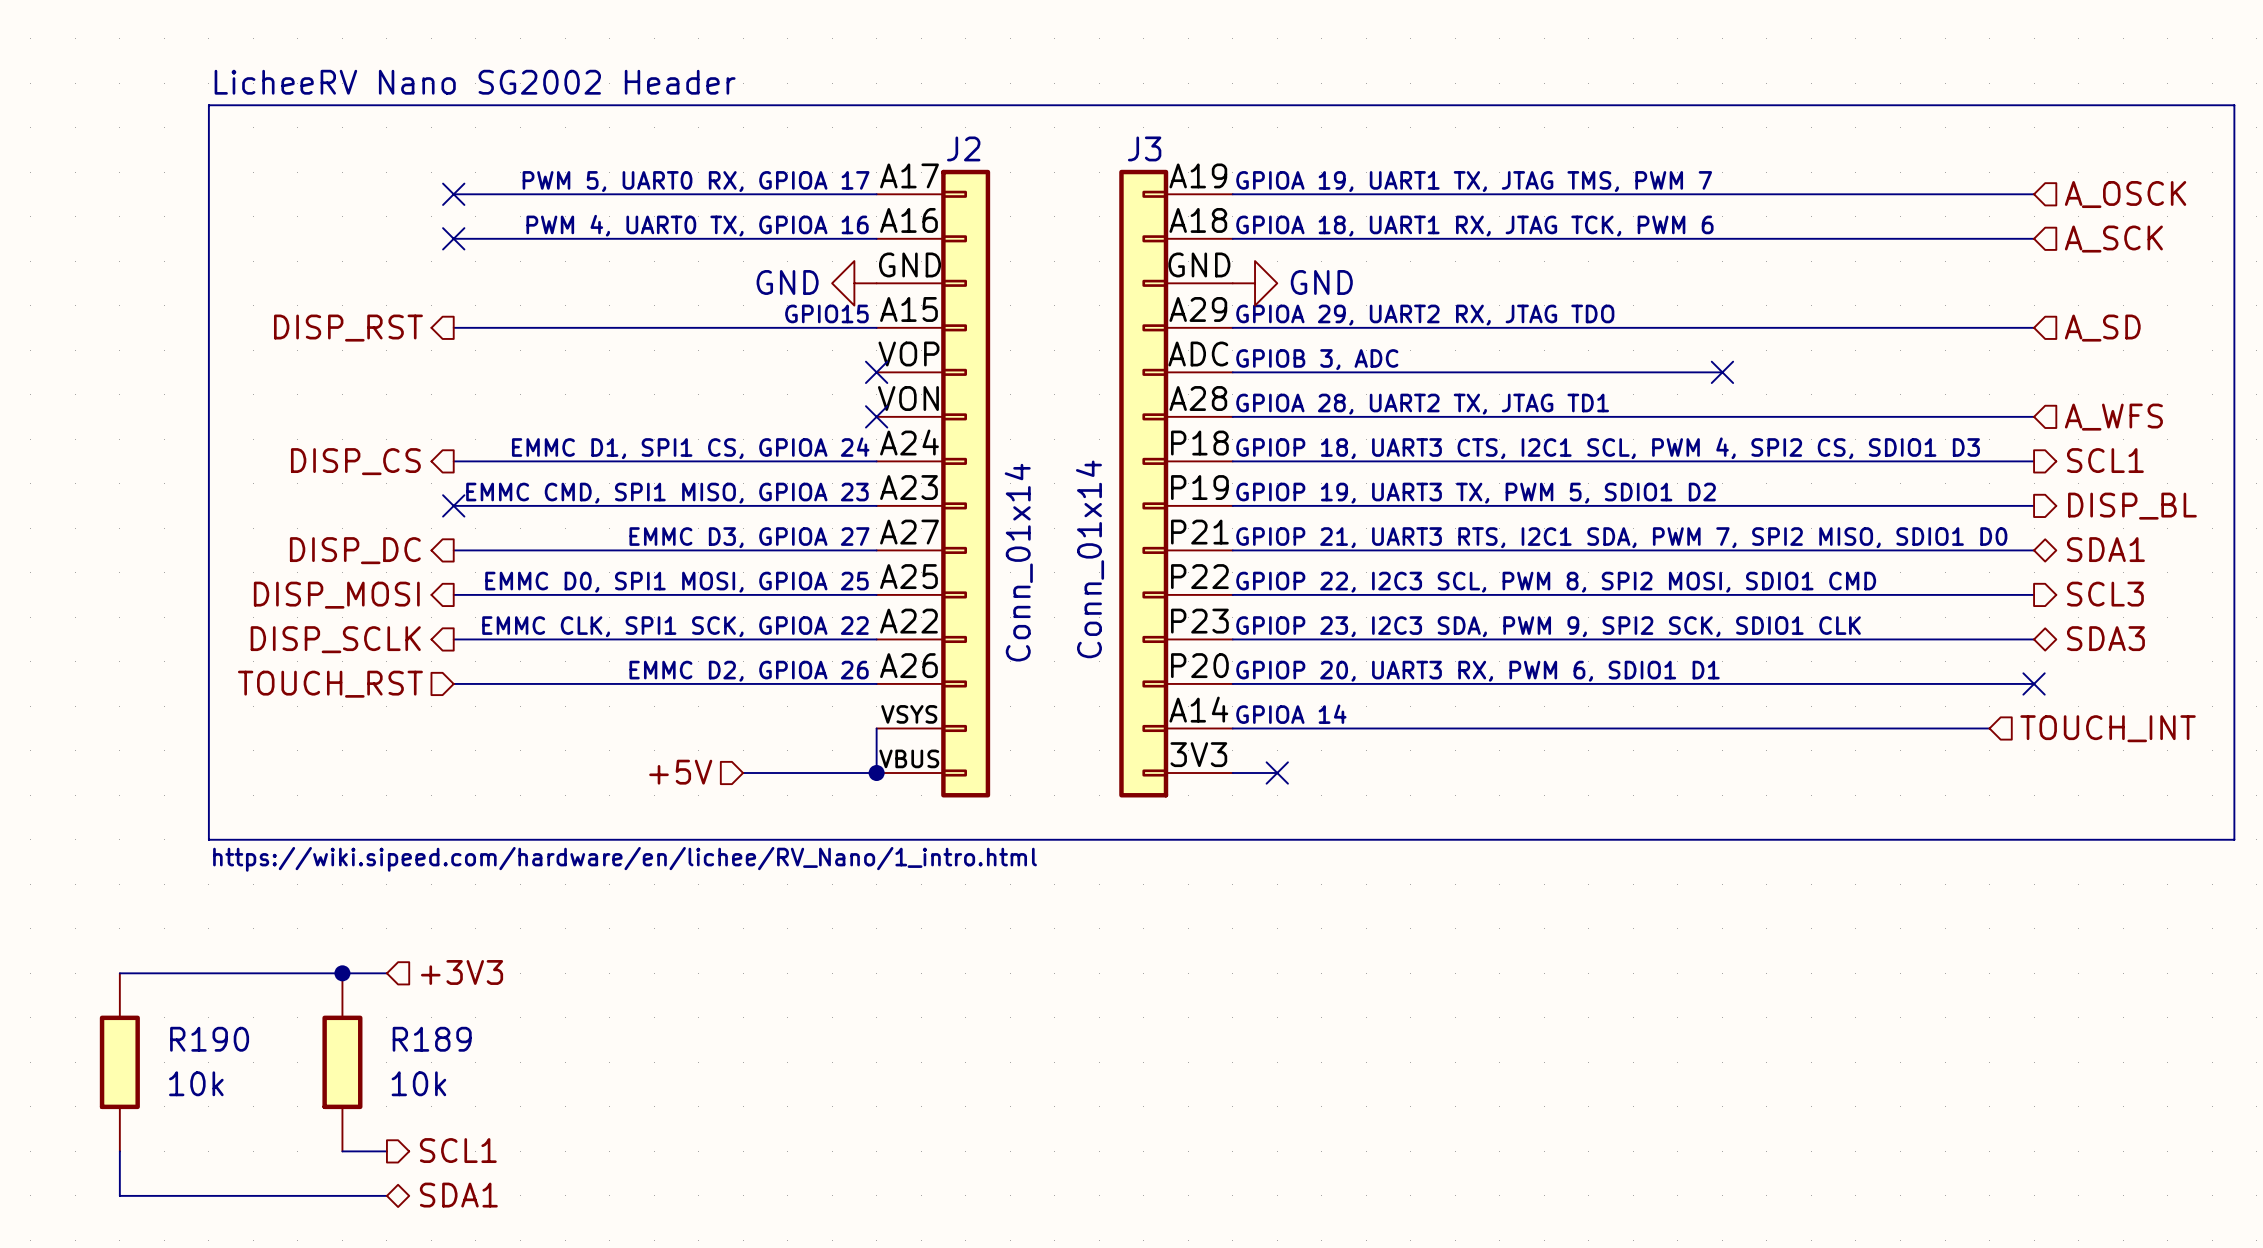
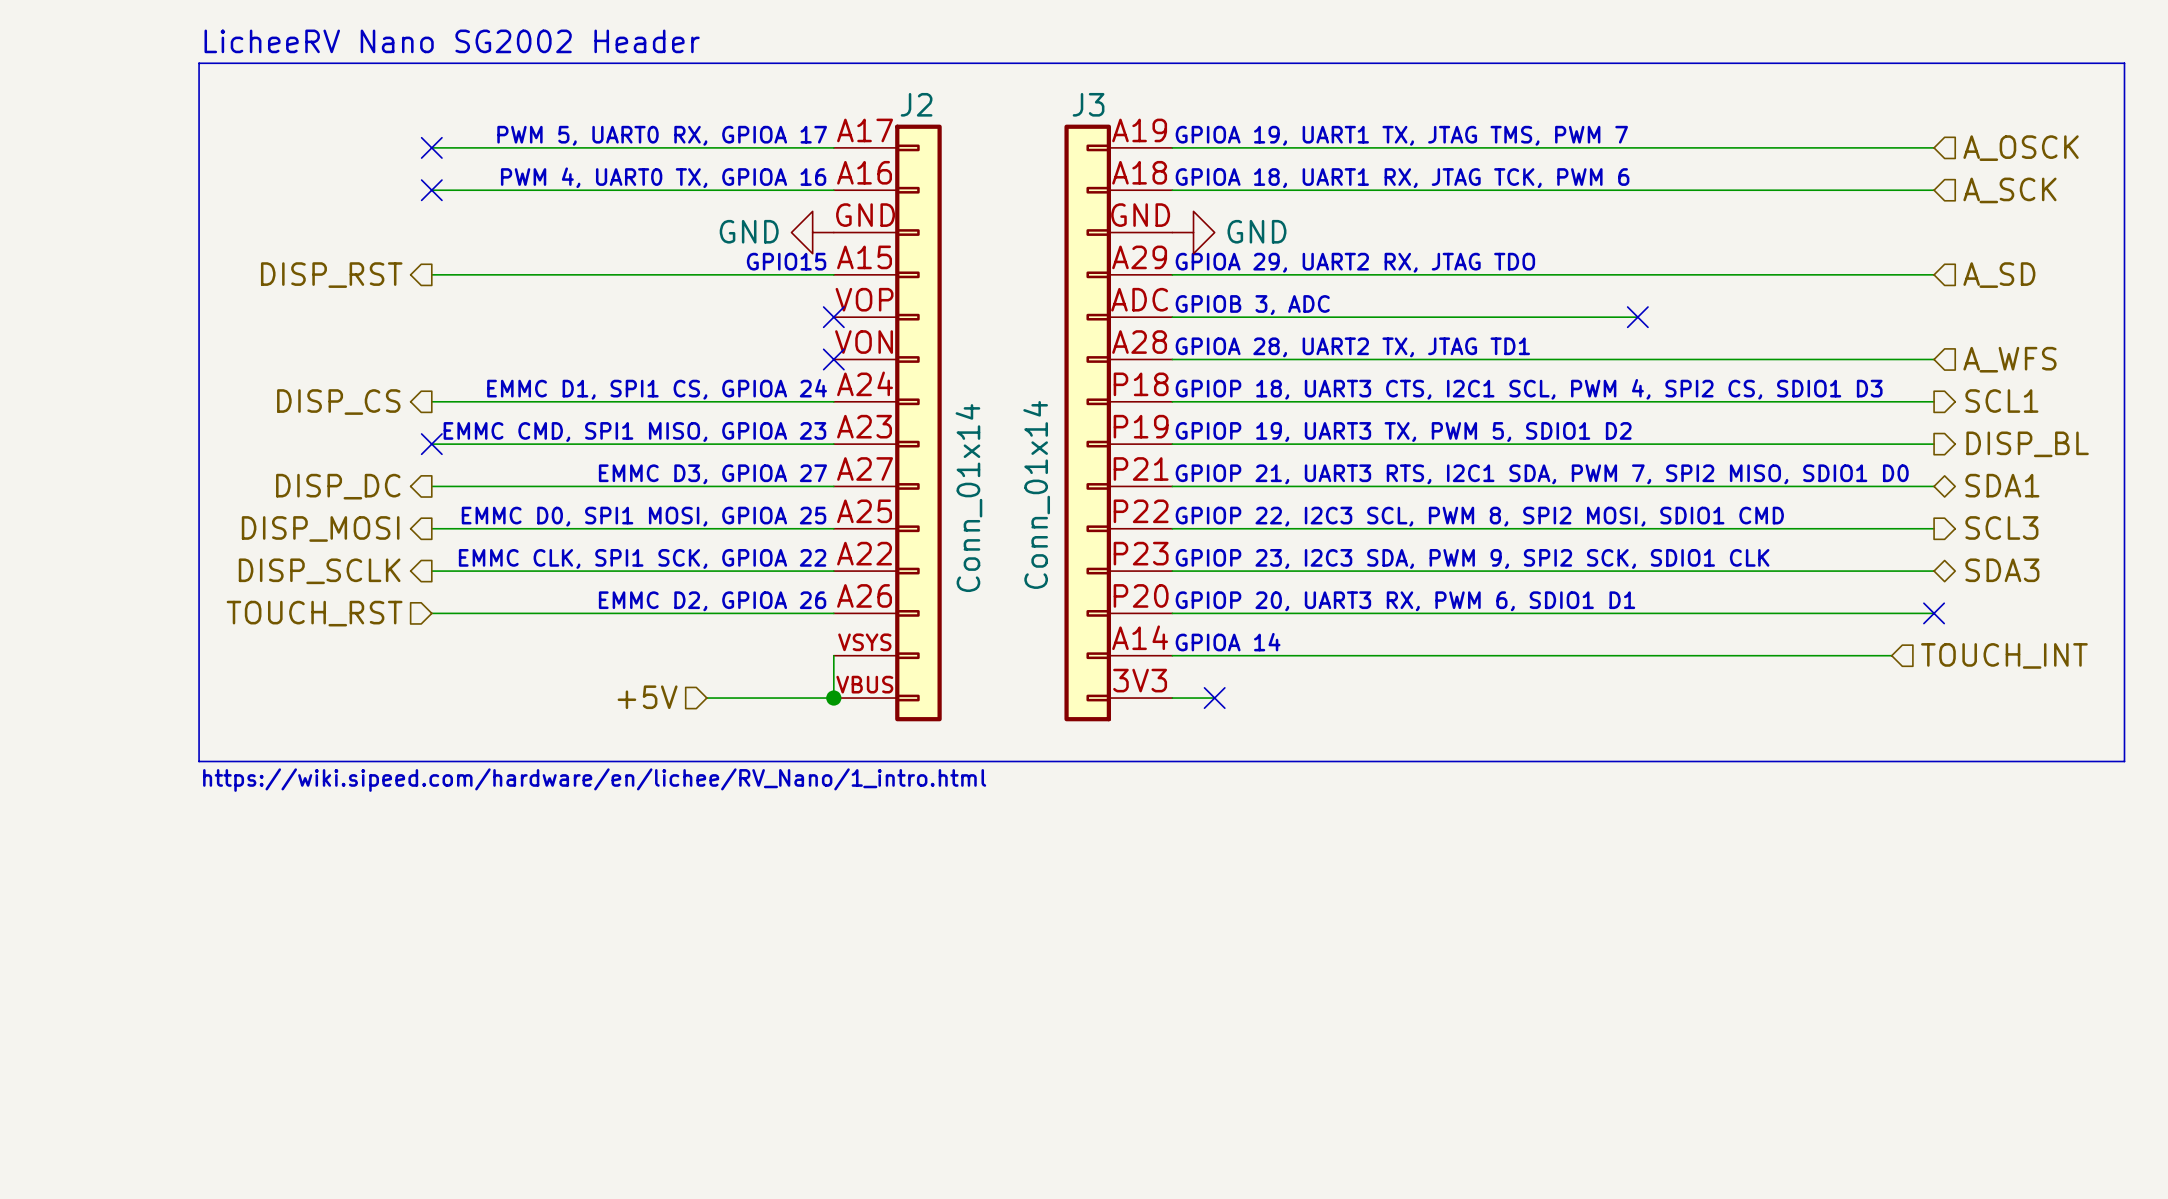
hierarchical label: +3V3 (462, 972) -> none
wire: (119, 973) (386, 973) -> none
junction: (342, 973) -> none
R190: 10k (119, 1062) -> none
R189: 10k (342, 1062) -> none
hierarchical label: SCL1 (458, 1150) -> none
wire: (119, 1151) (119, 1195) (386, 1195) -> none
wire: (342, 1151) (386, 1151) -> none
hierarchical label: SDA1 (458, 1195) -> none

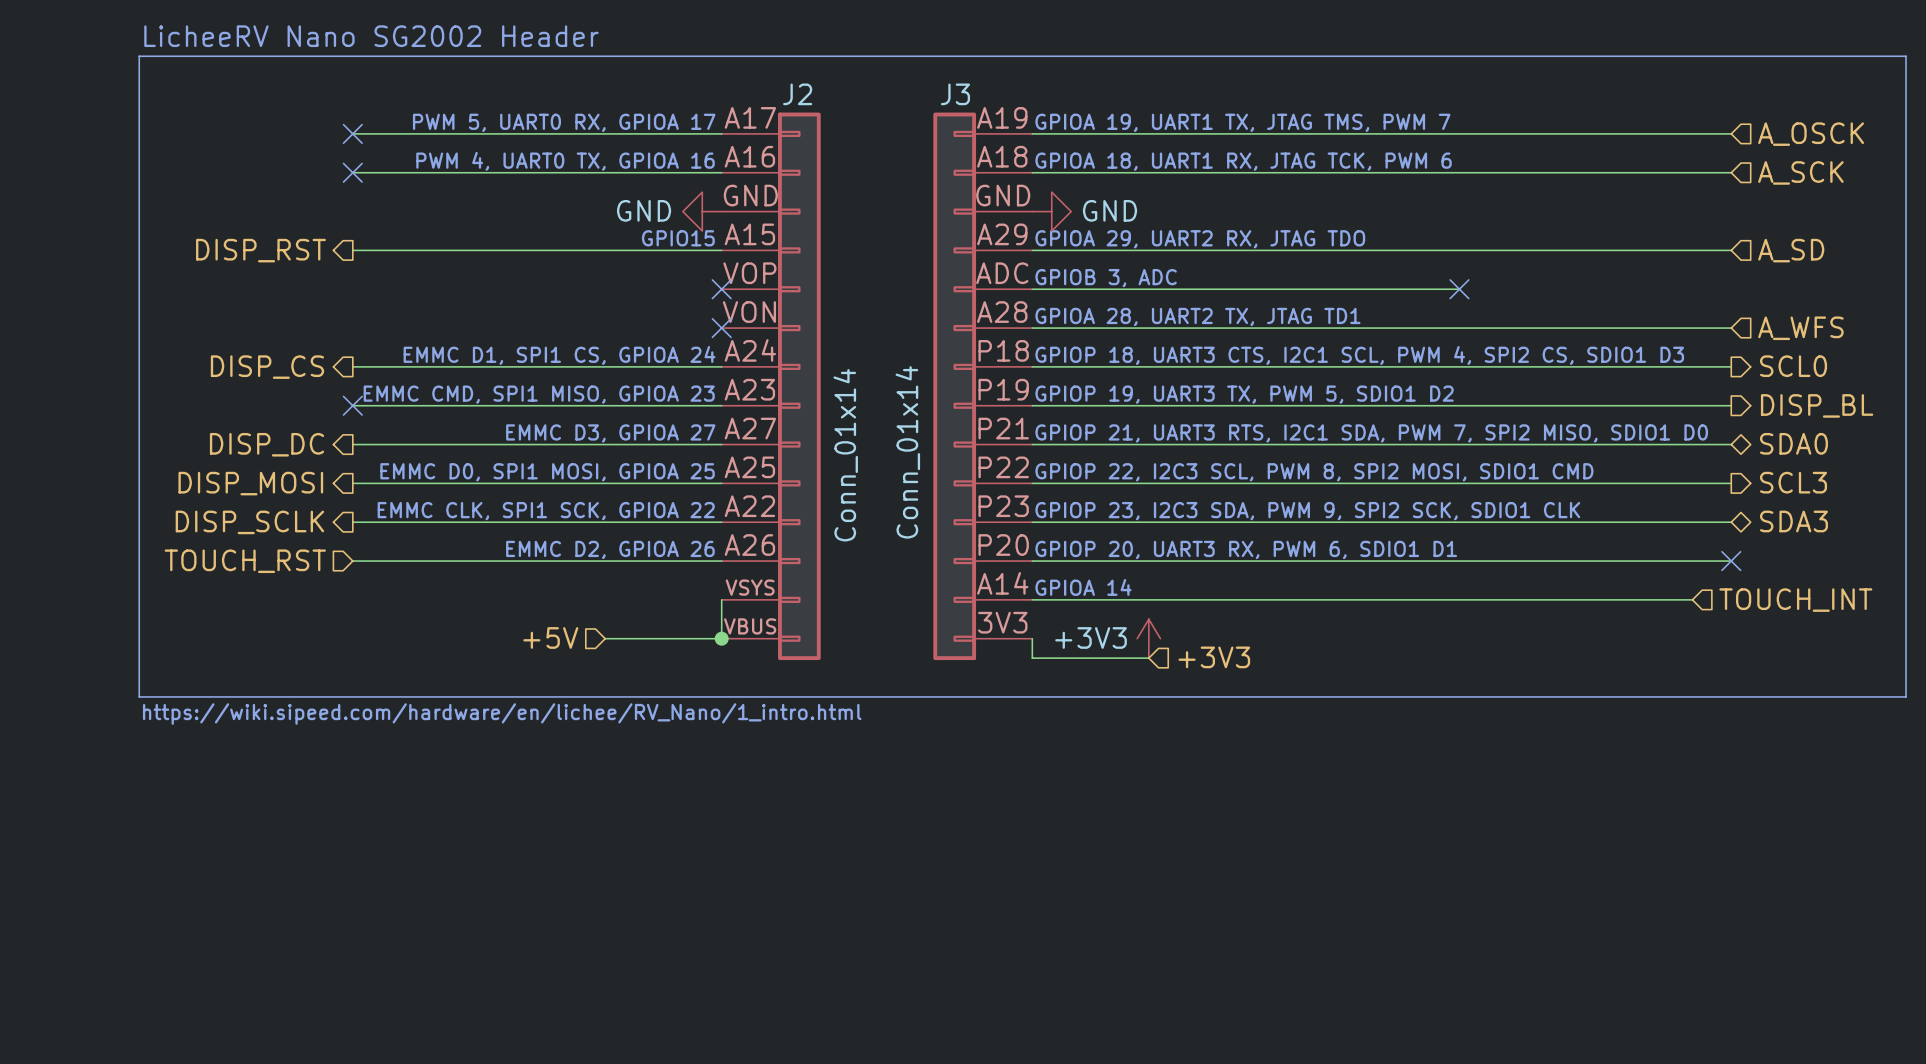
hierarchical label: SCL1 (2001, 401) -> SCL0 (1793, 366)
hierarchical label: SDA1 (2002, 485) -> SDA0 (1793, 443)
wire: (1172, 698) (1214, 698) -> (1032, 638) (1032, 658) (1148, 658)
no-connect mark: (1214, 698) -> none
power symbol: none -> +3V3 (1148, 638)
hierarchical label: none -> +3V3 (1214, 657)

